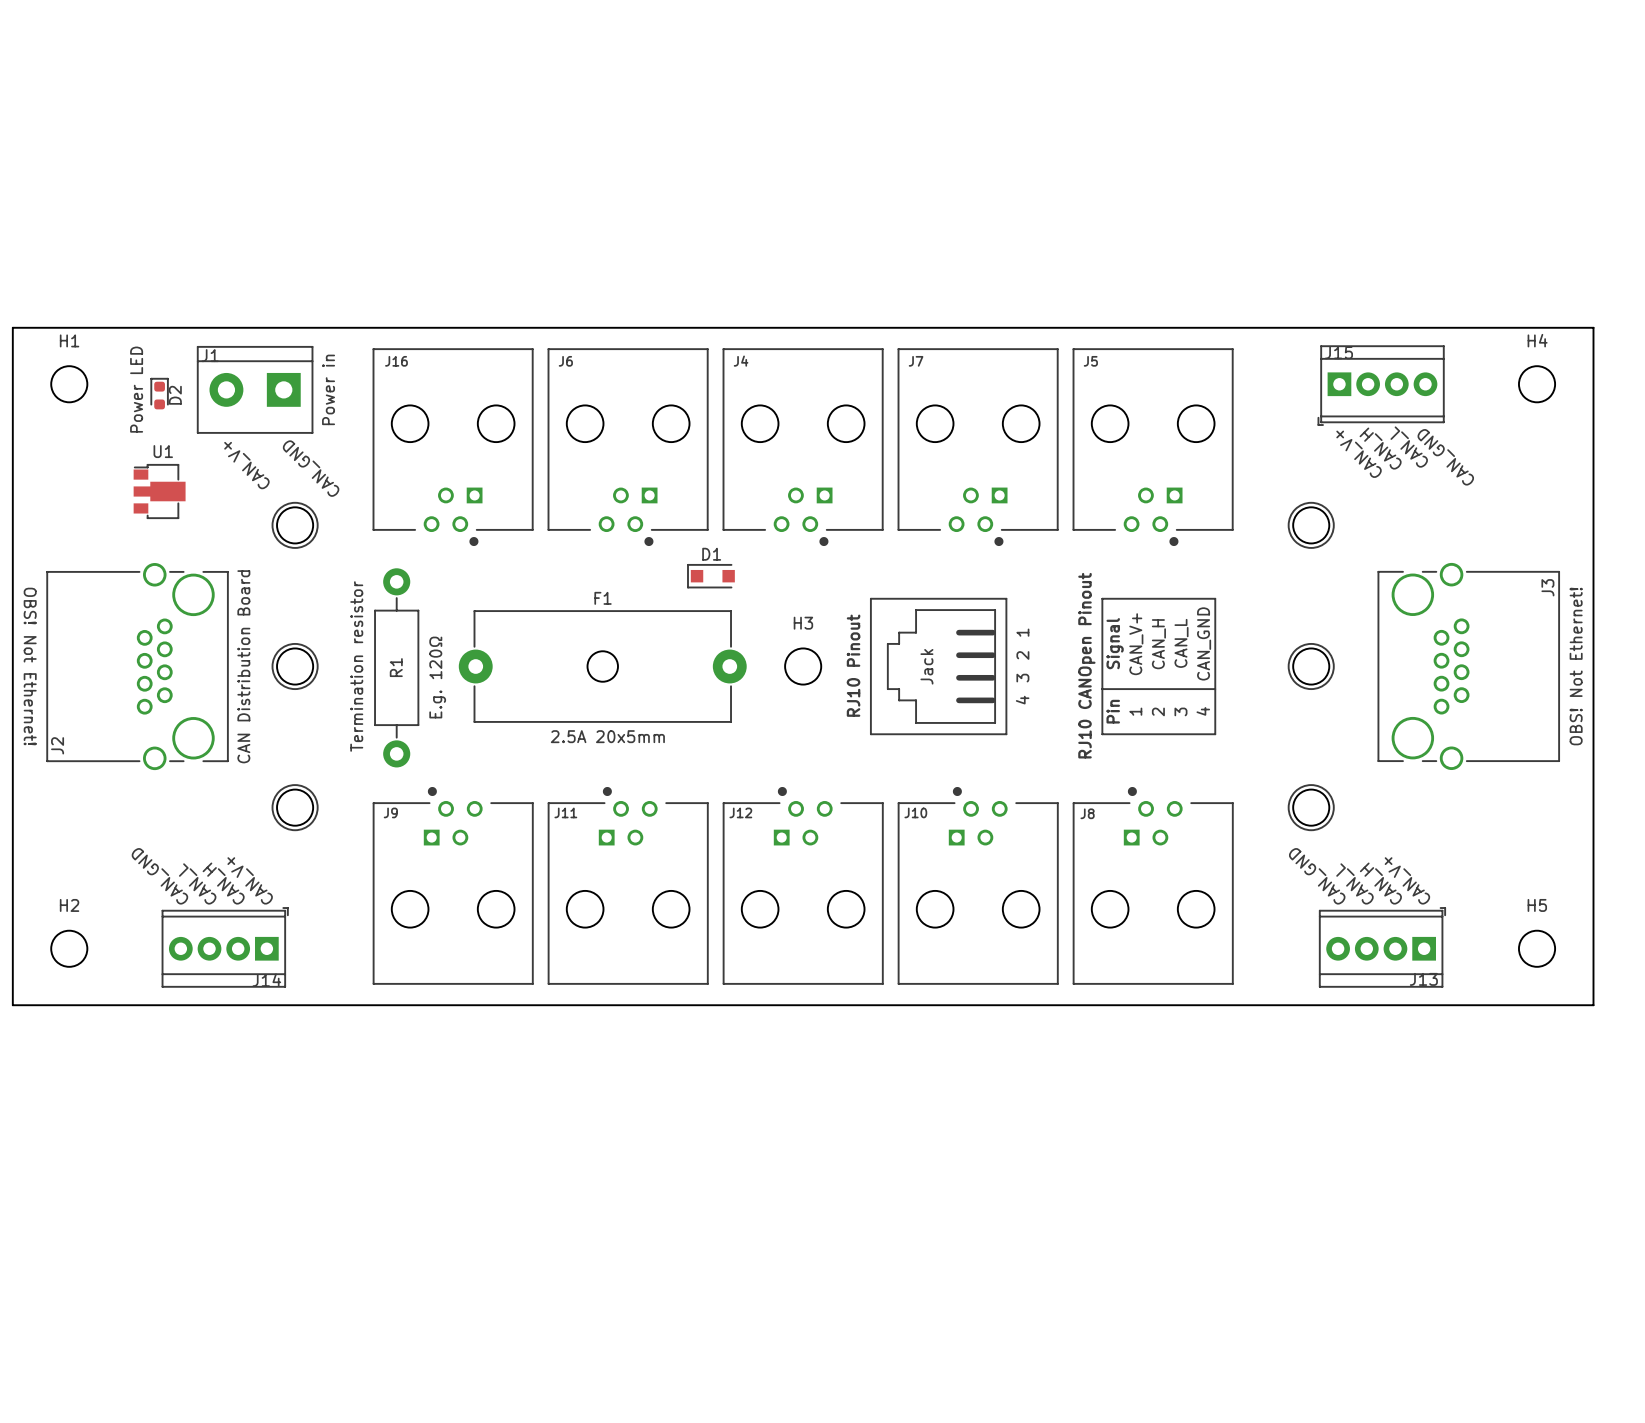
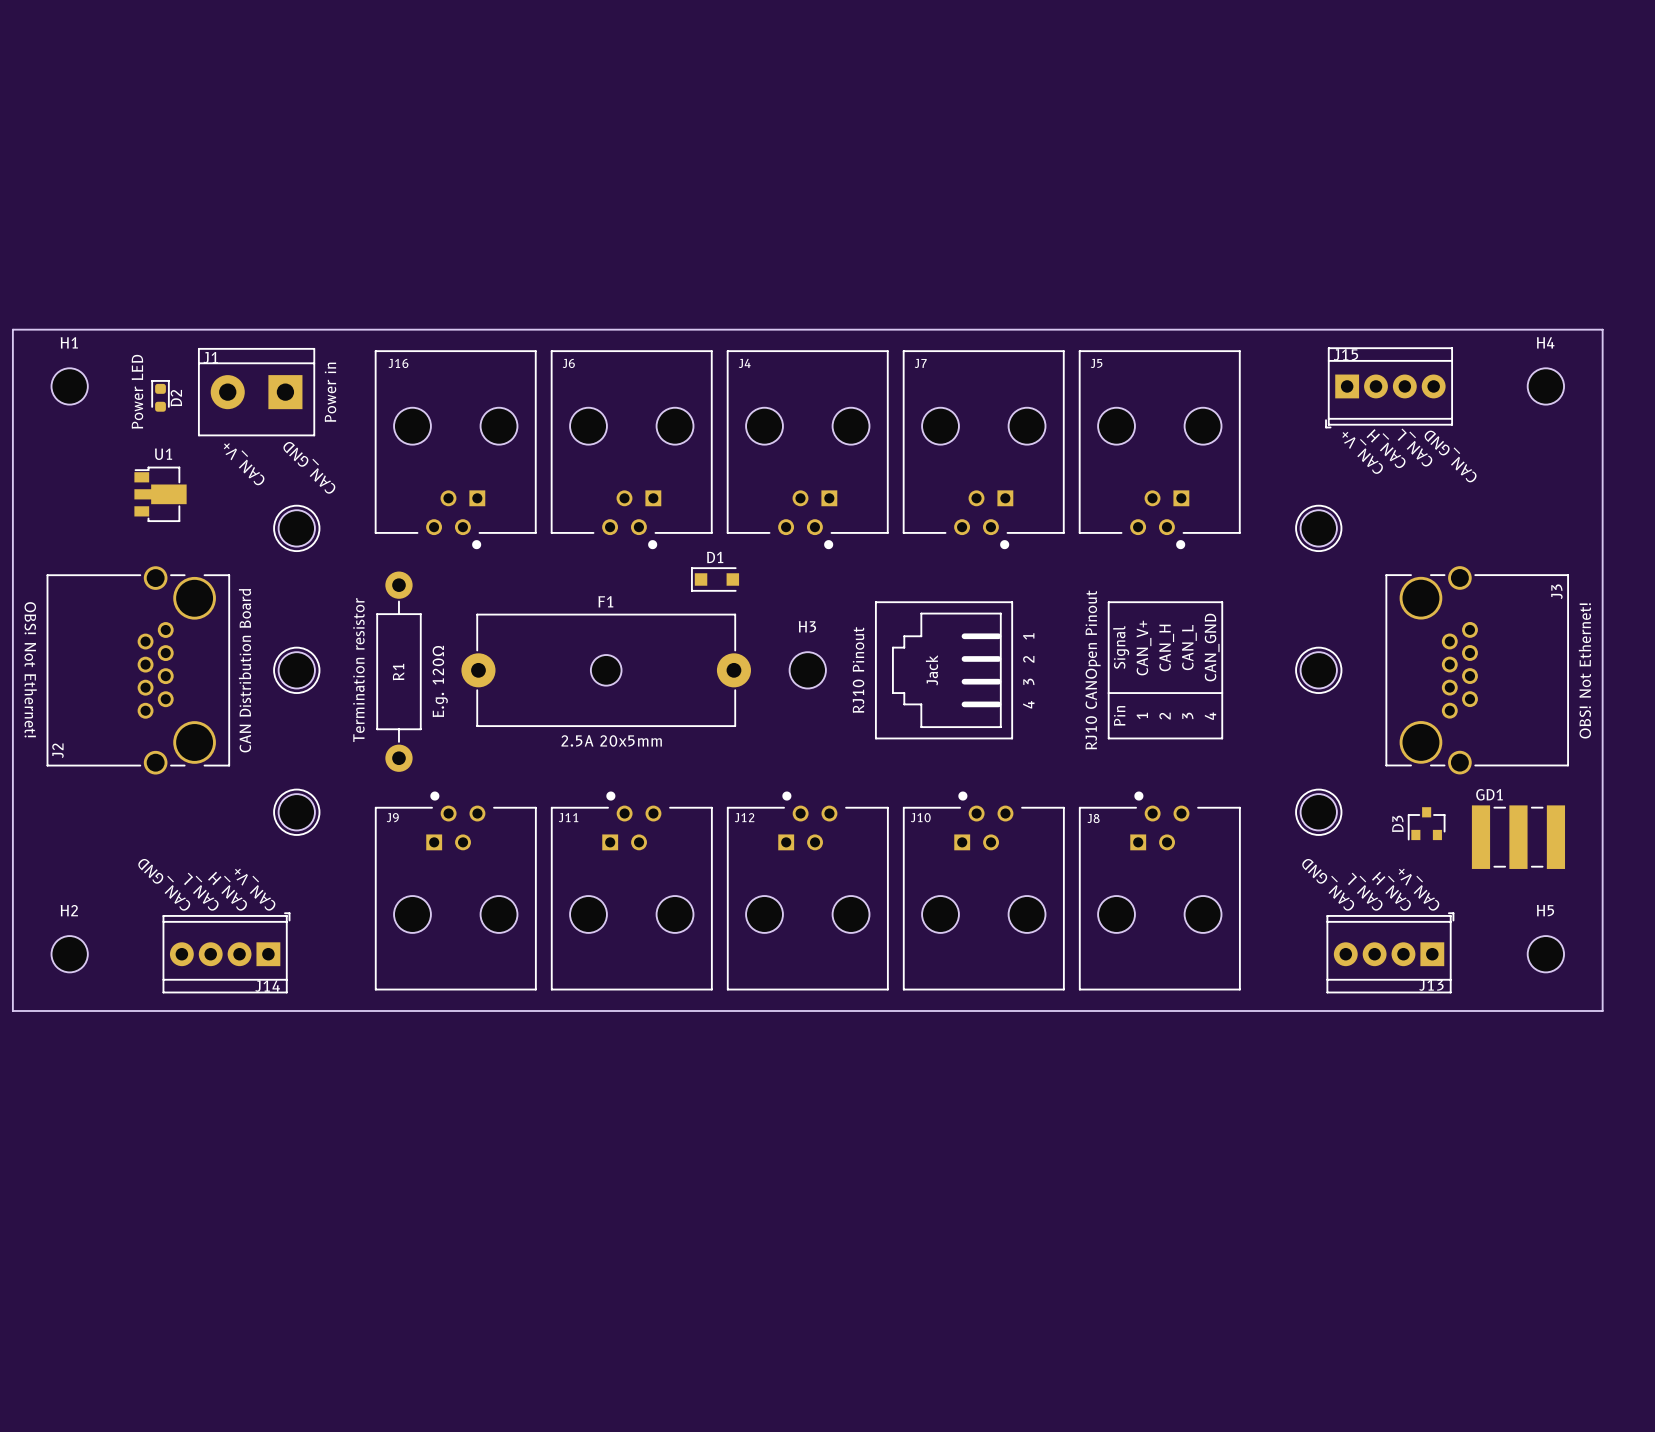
D3: none -> (1426, 823)
GD1: none -> (1518, 837)

